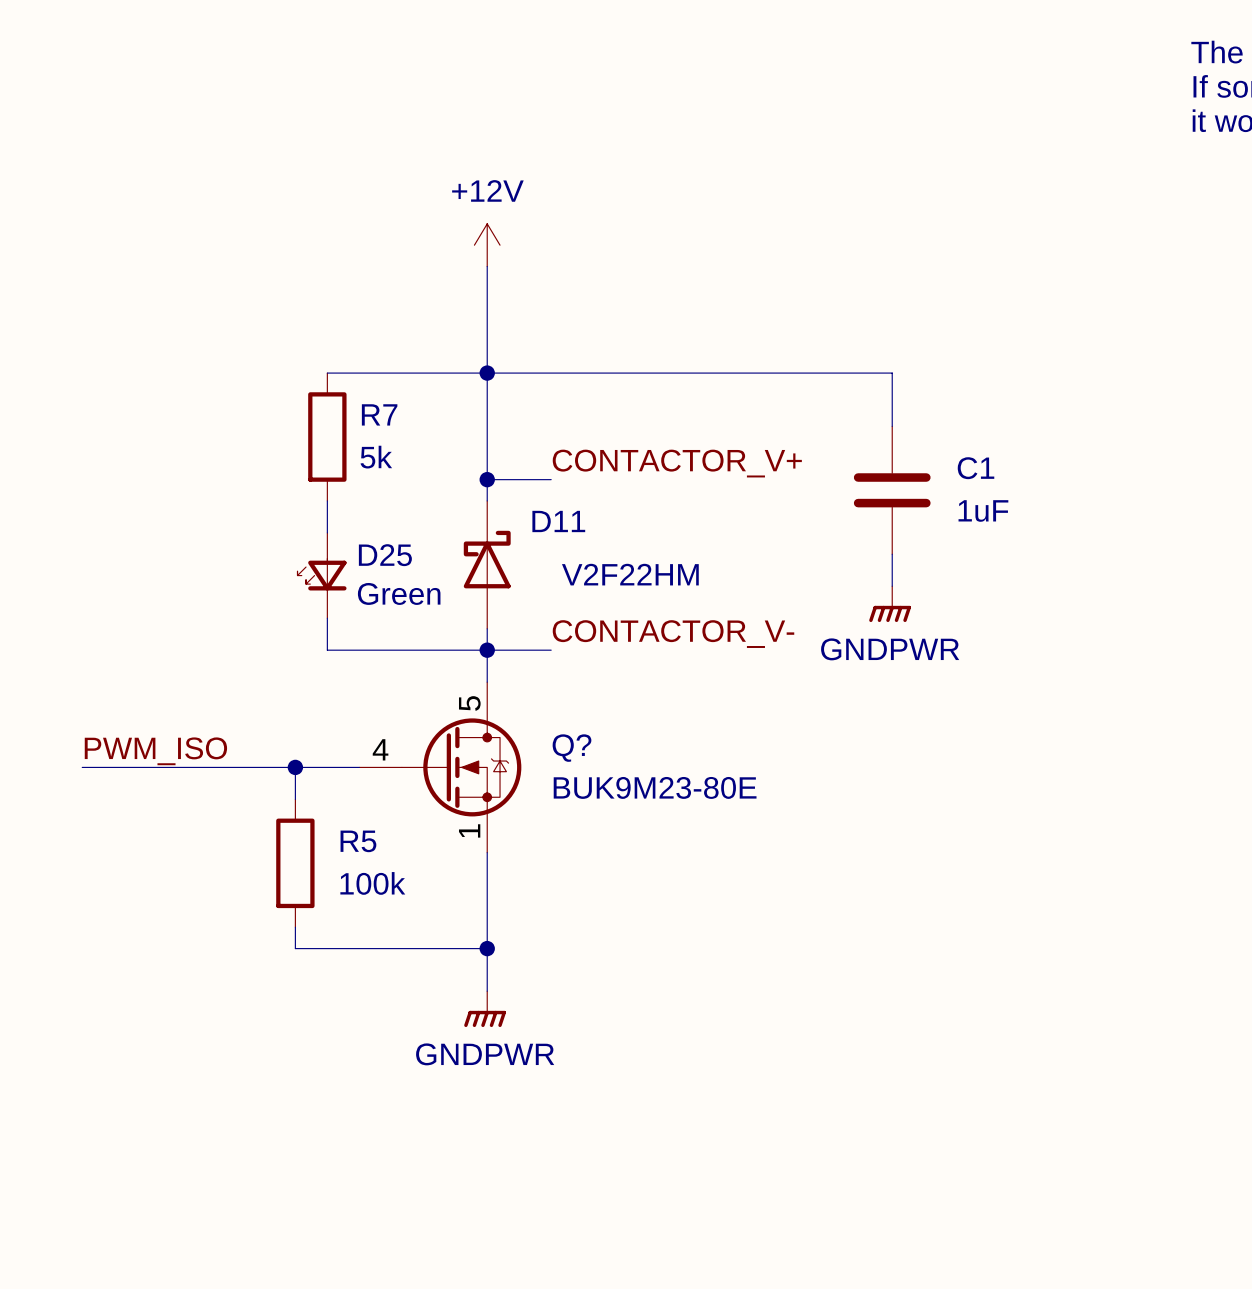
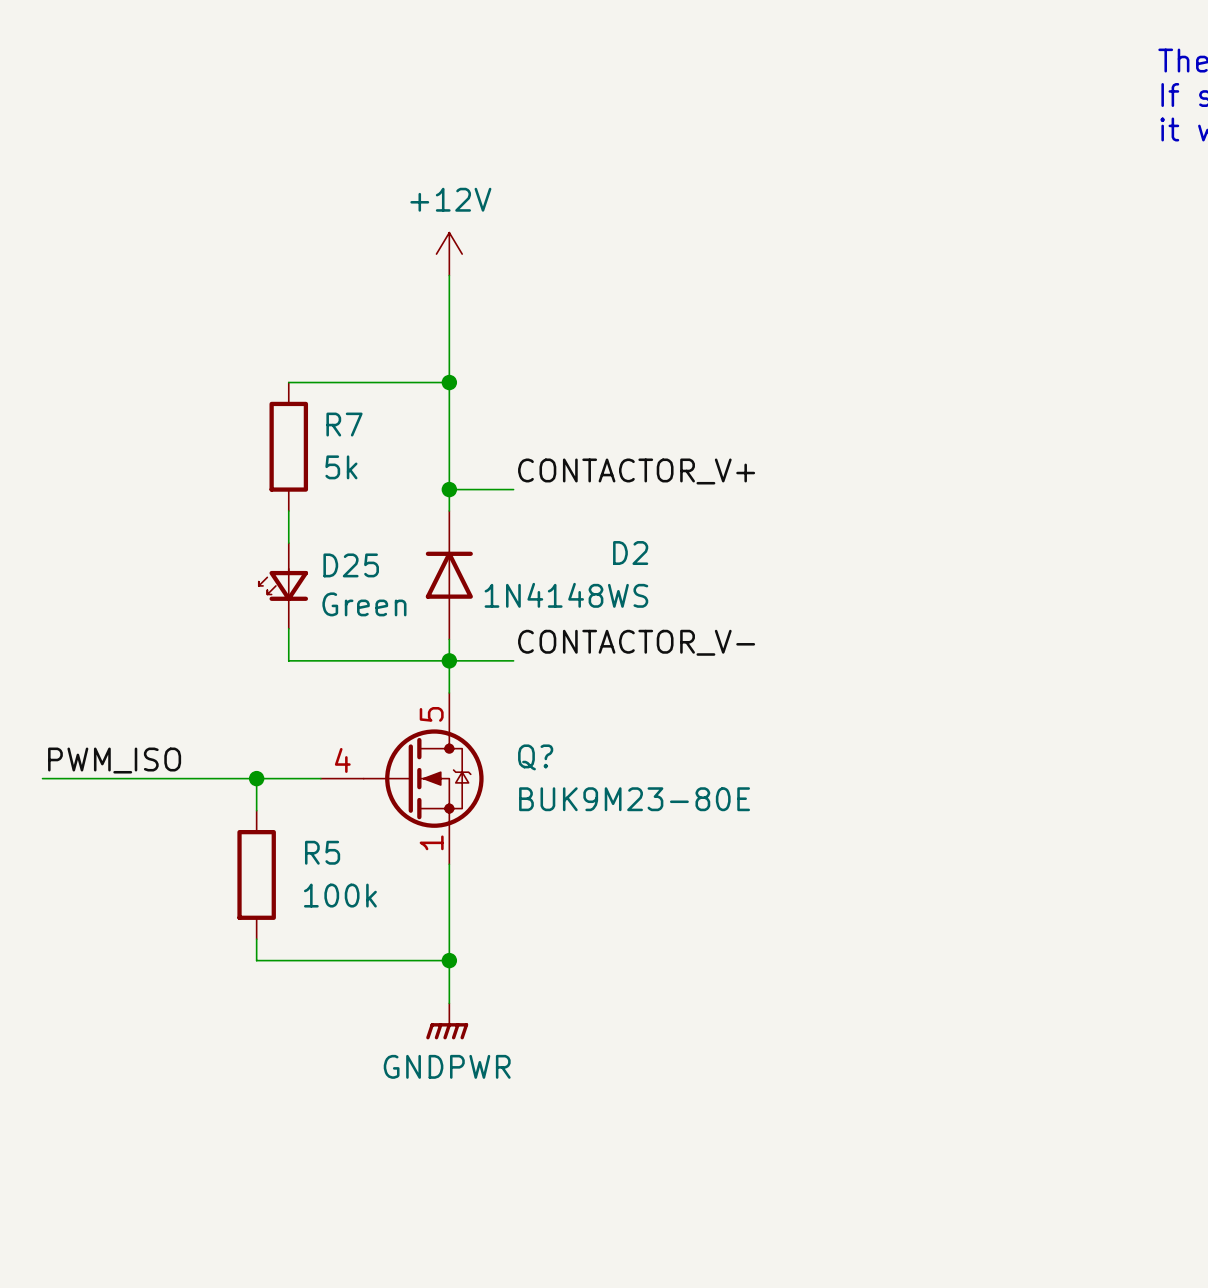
wire: (487, 373) (892, 373) (892, 426) -> none
C1: 1uF (892, 490) -> none
wire: (892, 554) (892, 586) -> none
D11: V2F22HM (487, 564) -> none
D2: none -> 1N4148WS (449, 575)
power symbol: GNDPWR (890, 604) -> none

